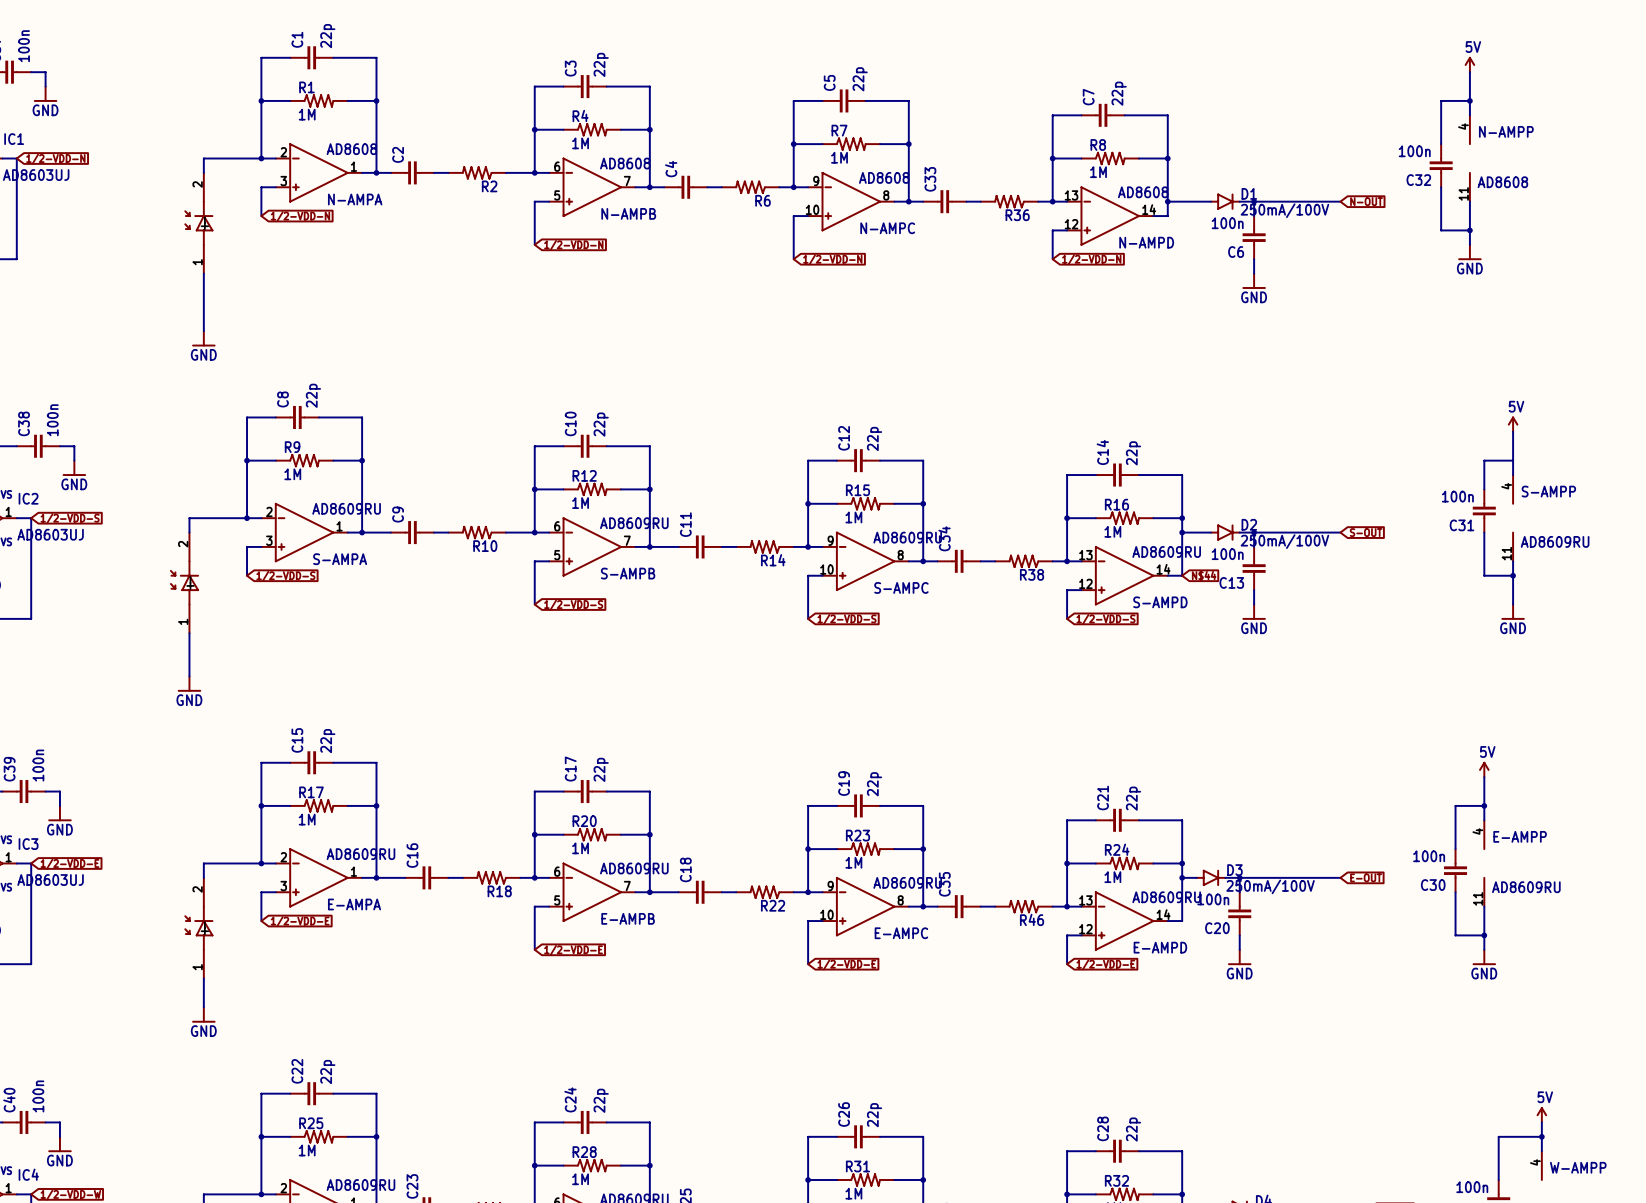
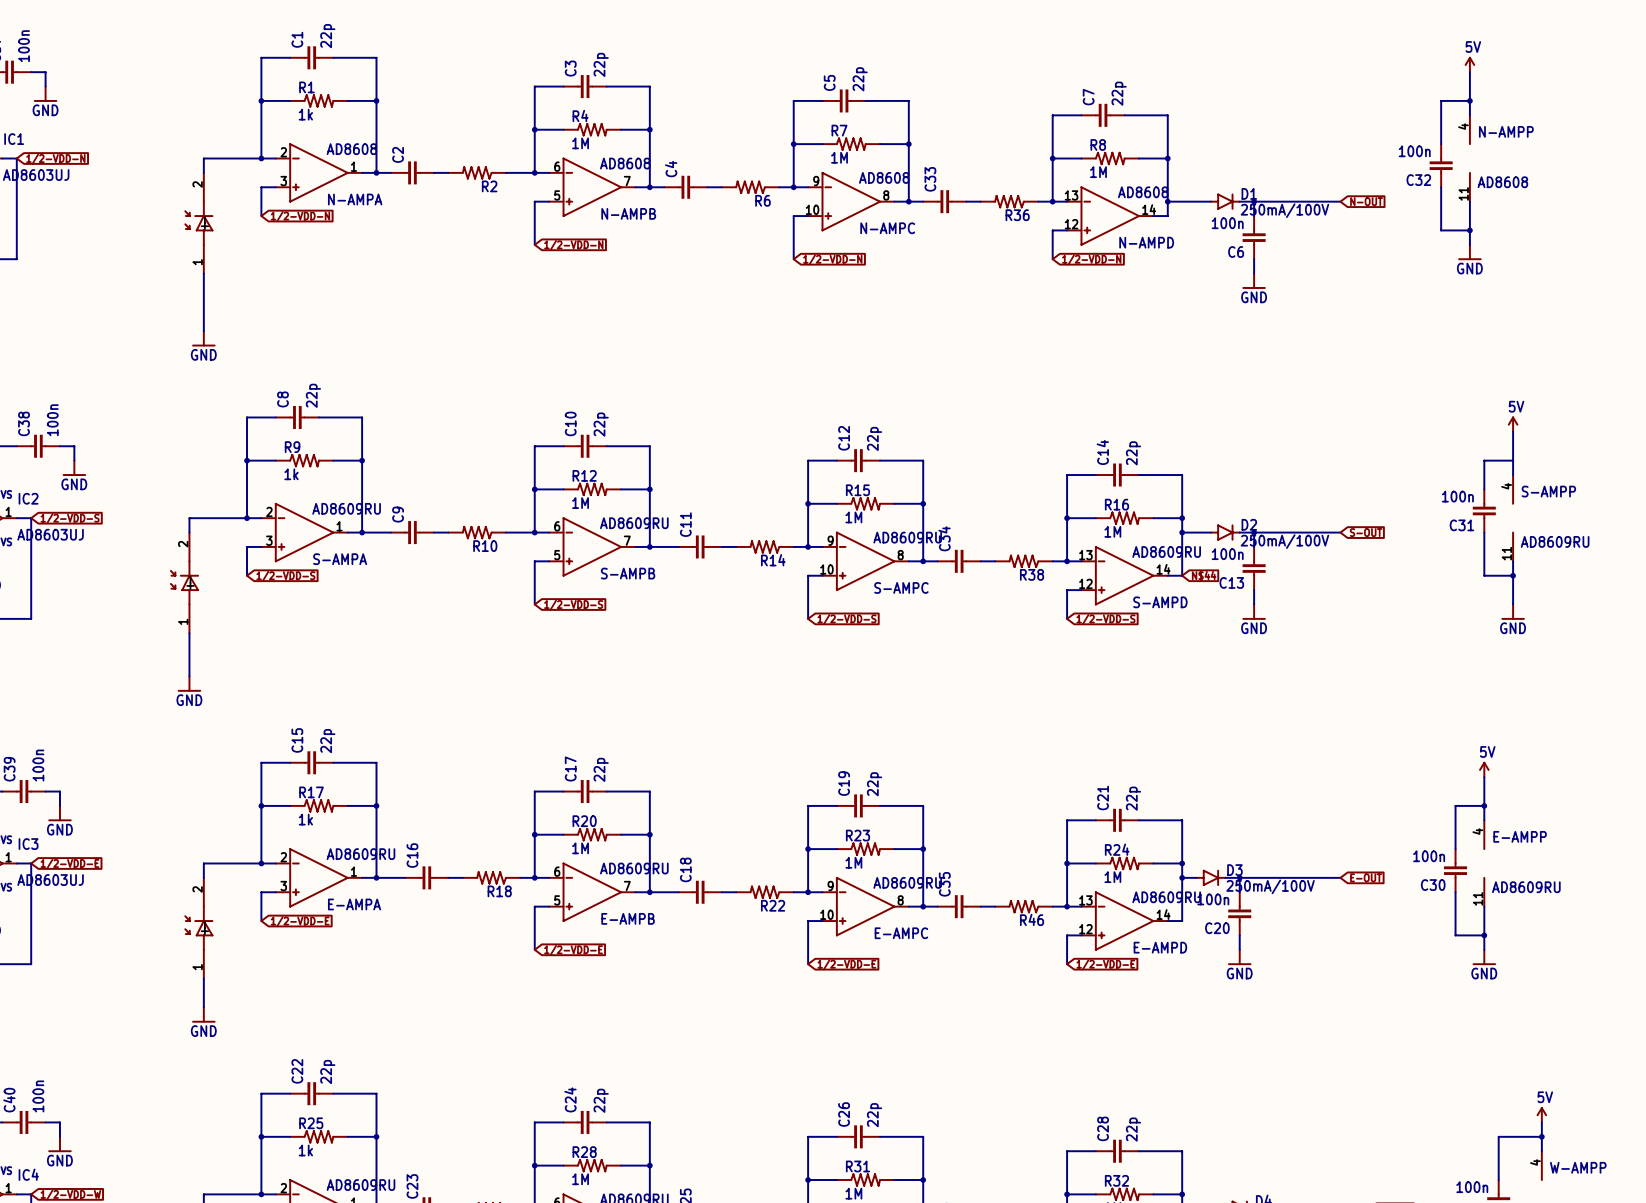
R1 value: 1M (307, 114) -> 1k (305, 114)
R9 value: 1M (292, 474) -> 1k (291, 474)
R17 value: 1M (307, 819) -> 1k (305, 819)
R25 value: 1M (307, 1150) -> 1k (305, 1150)

